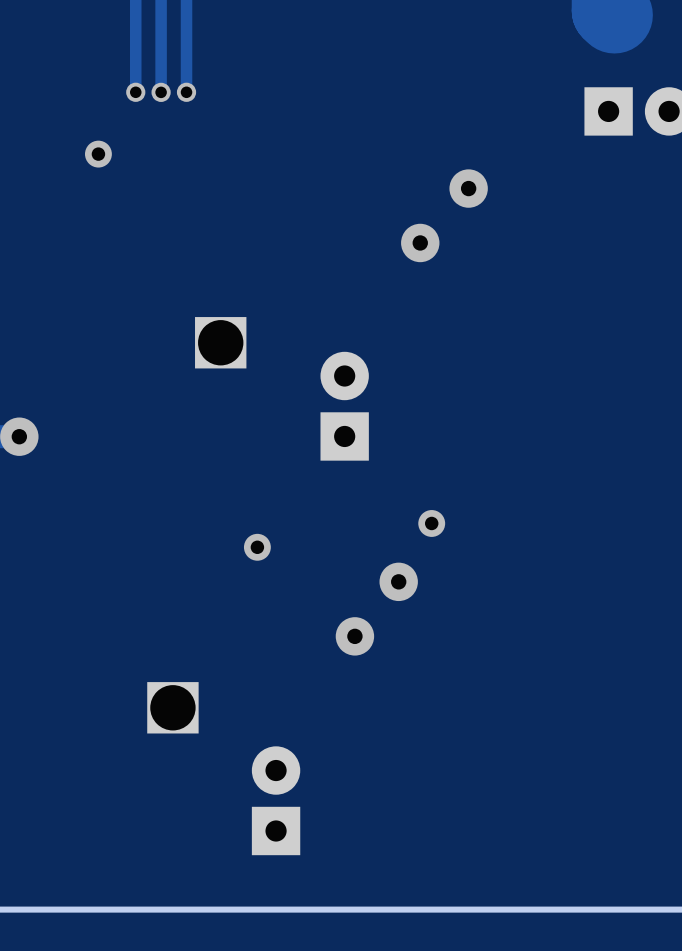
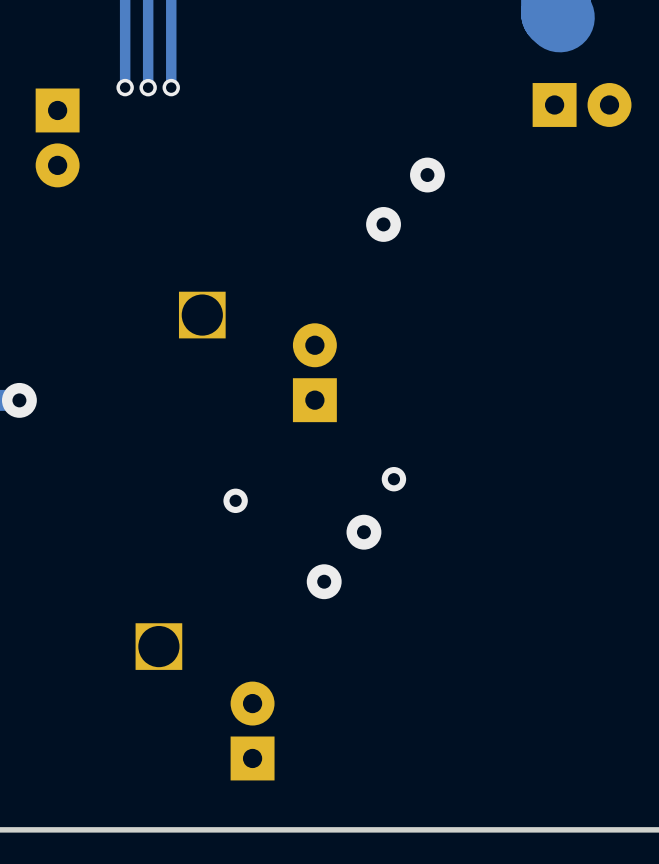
part: none -> (57, 137)
via: (98, 154) -> none

